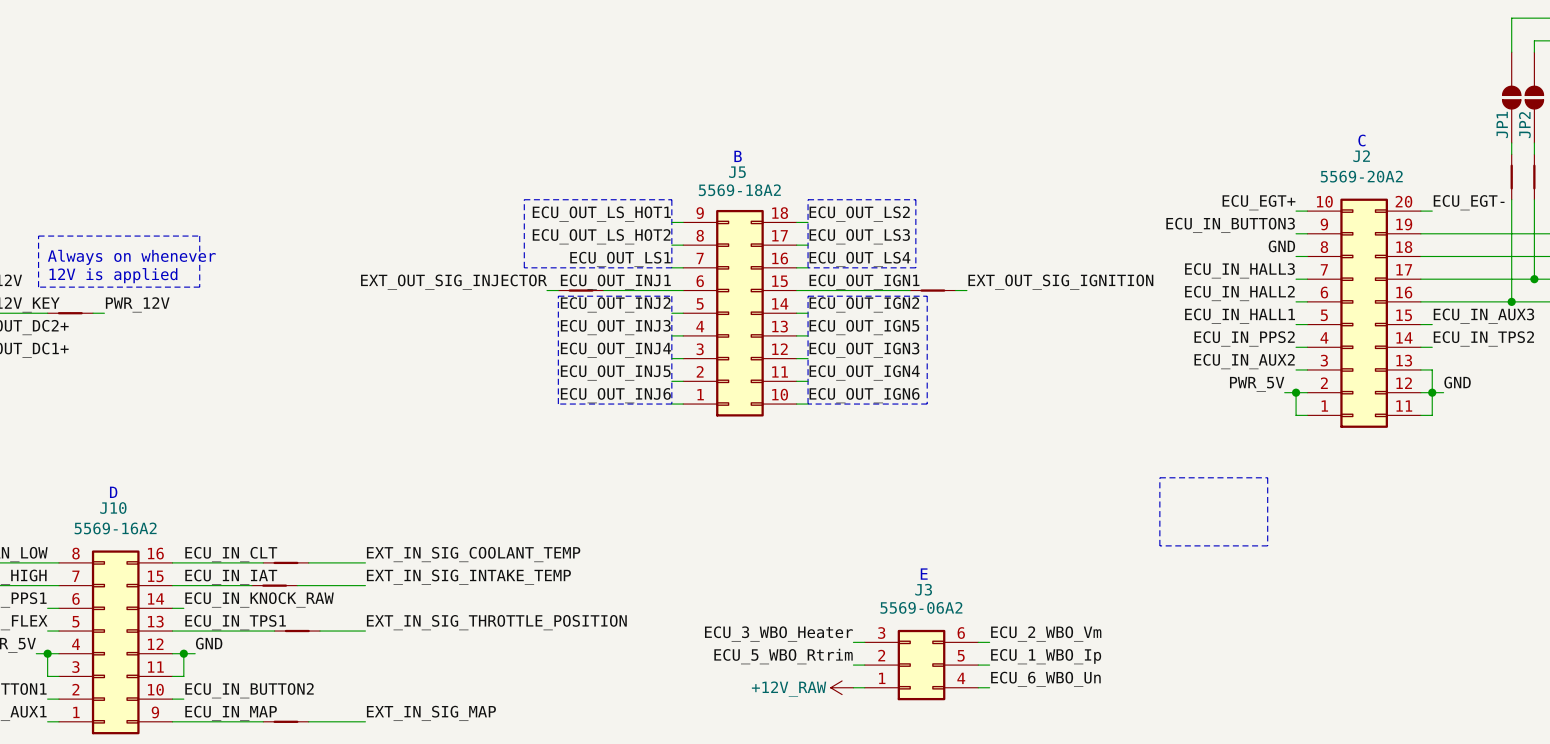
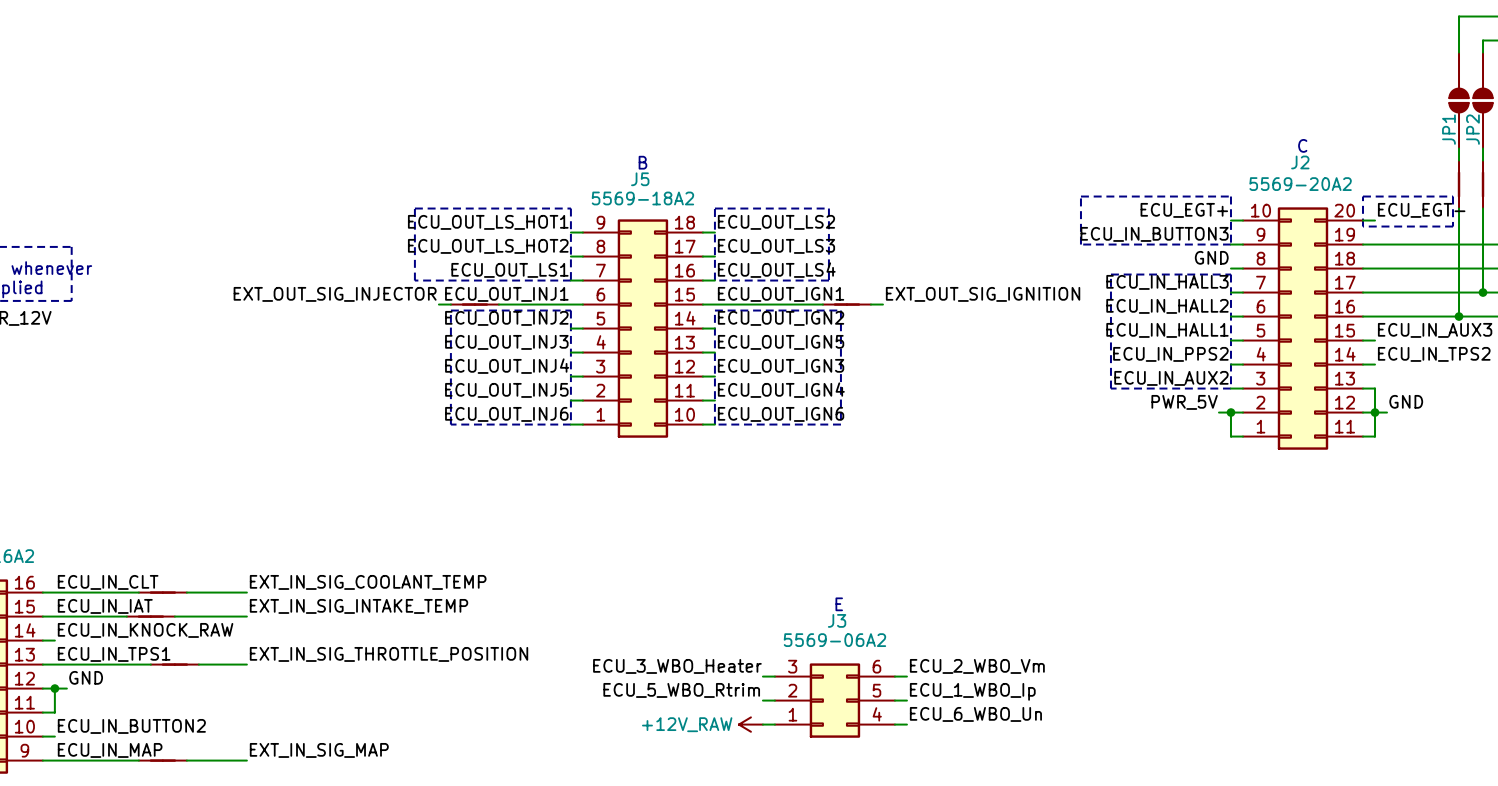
line: none -> (1080, 196) (1230, 196) (1230, 244) (1080, 244) (1080, 196)
line: none -> (1363, 196) (1453, 196) (1453, 226) (1363, 226) (1363, 196)
line: none -> (1110, 274) (1230, 274) (1230, 388) (1110, 388) (1110, 274)
line: (1159, 477) (1267, 477) (1267, 545) (1159, 545) (1159, 477) -> none

